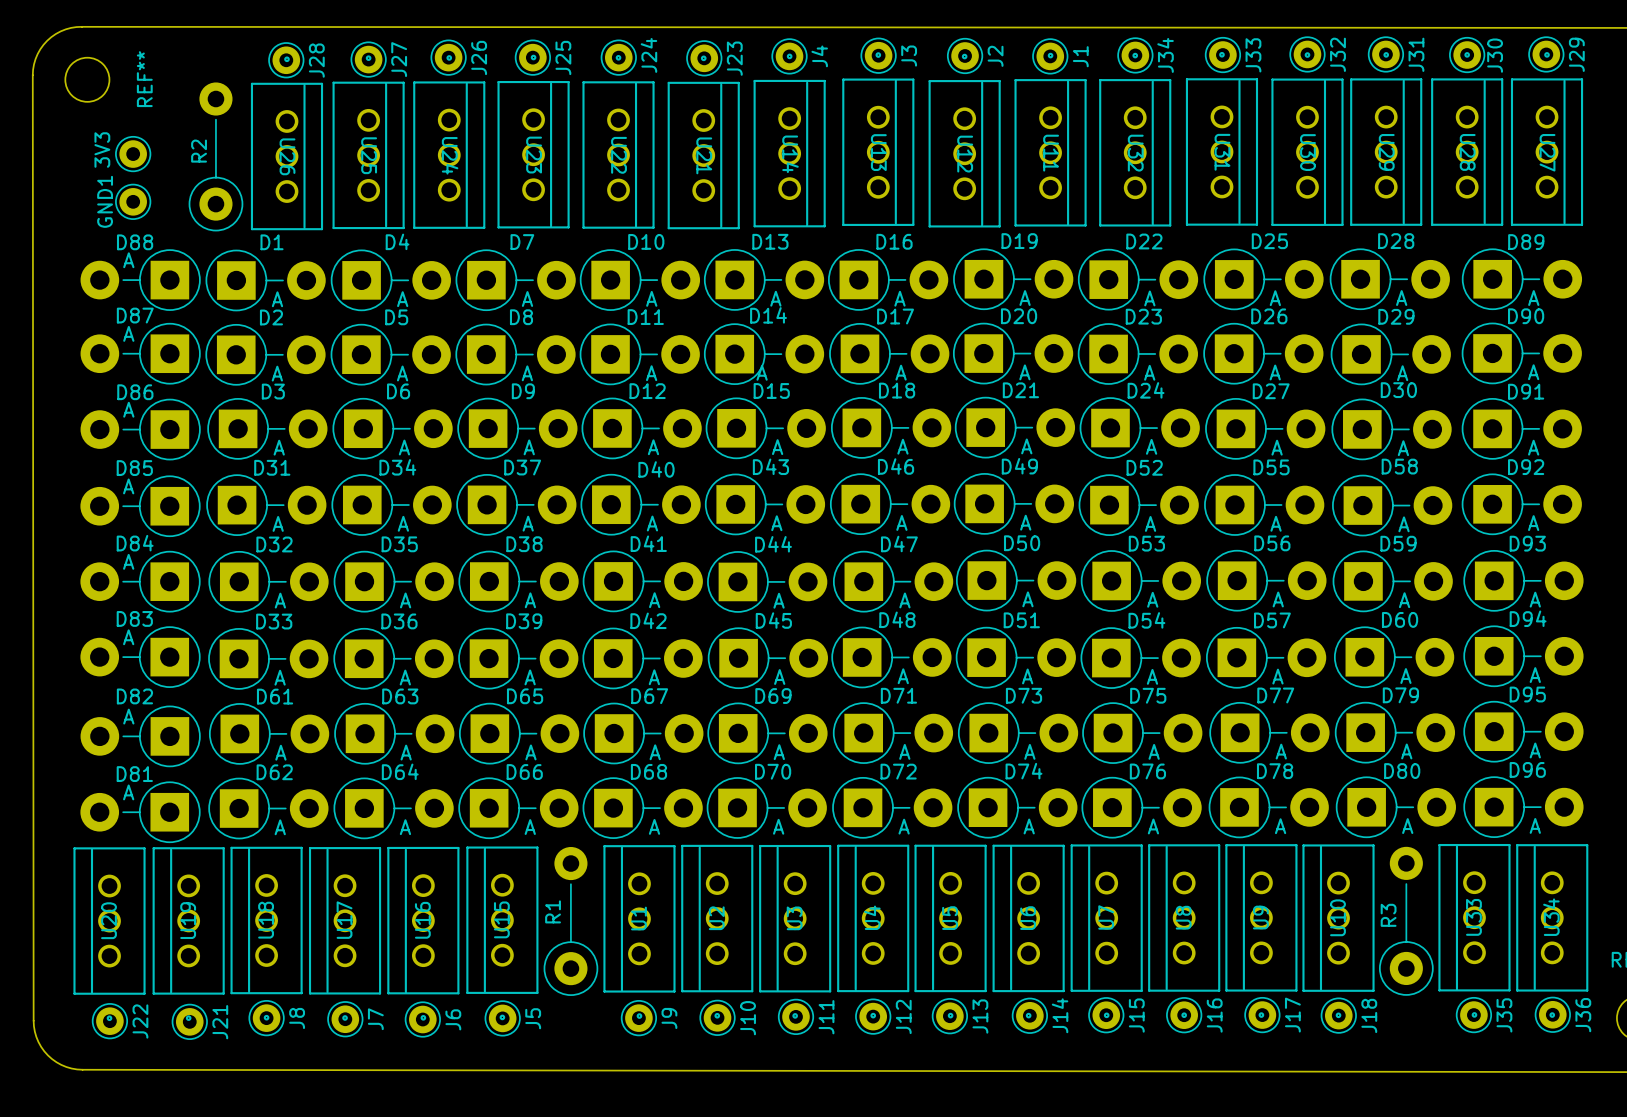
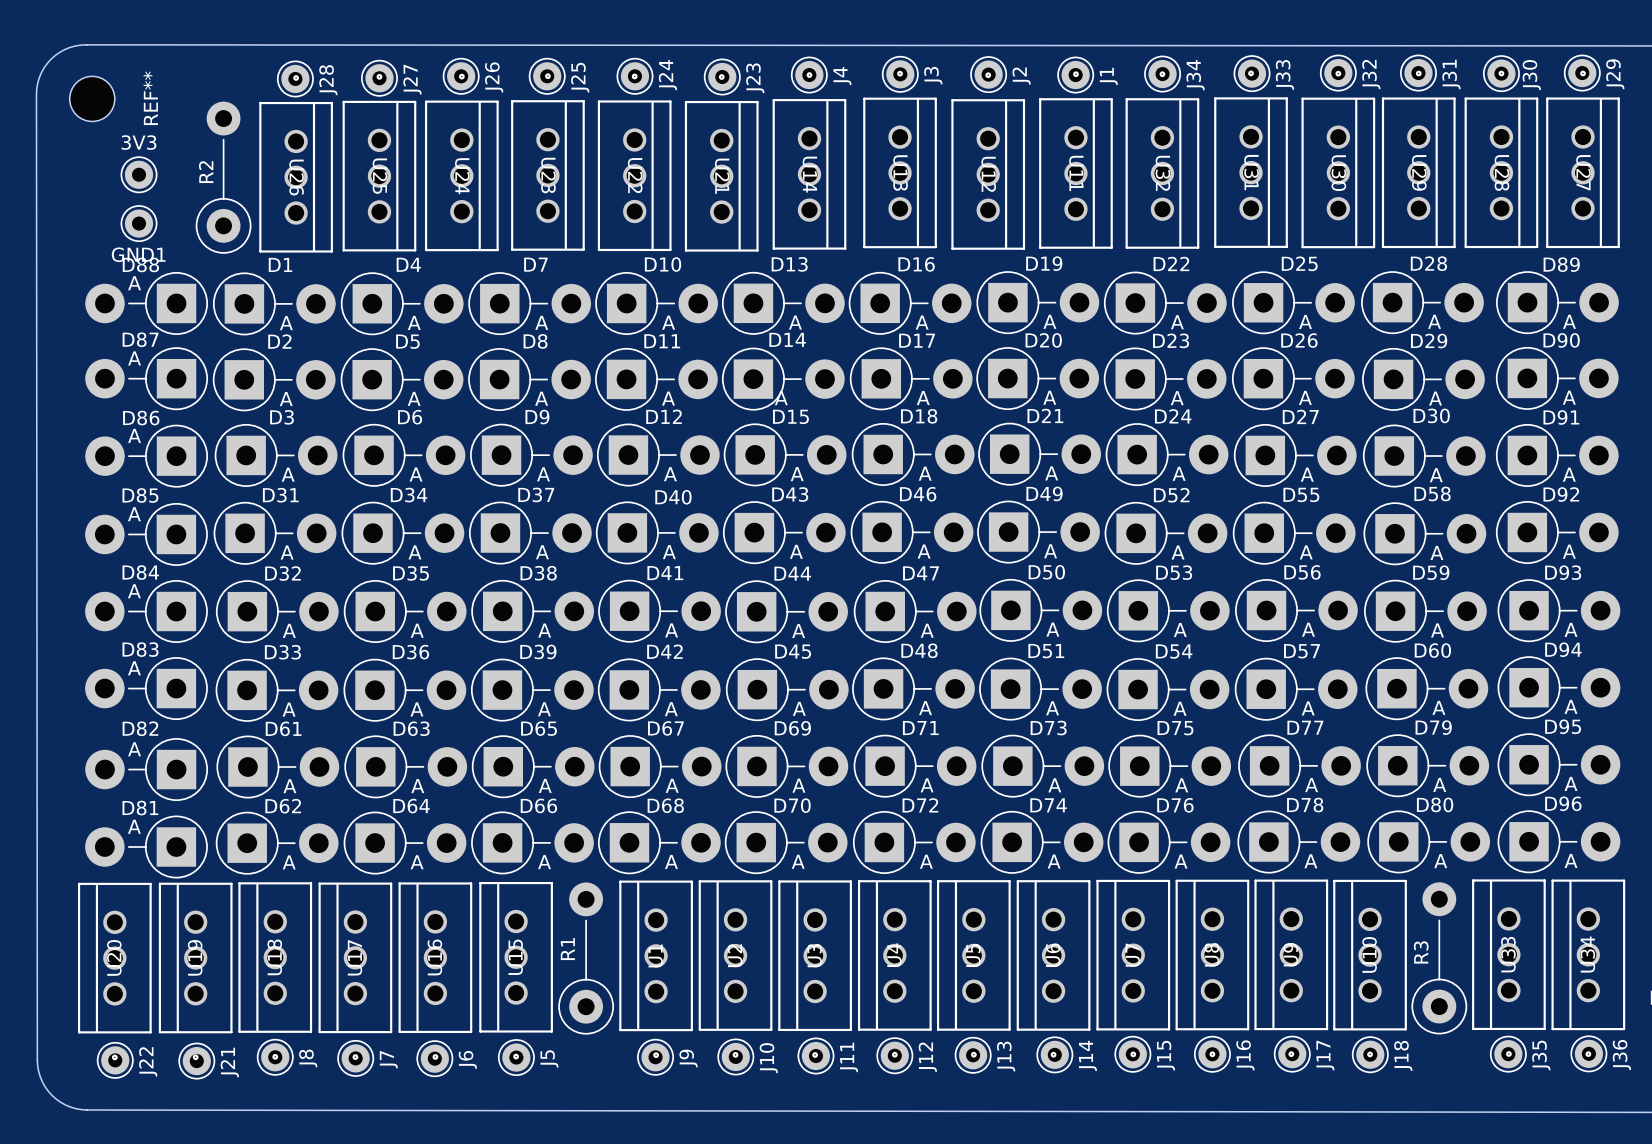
3V3 name rotation: 0° (102, 150) -> 90° clockwise (138, 142)
GND1 name rotation: 0° (105, 201) -> 90° clockwise (138, 254)

